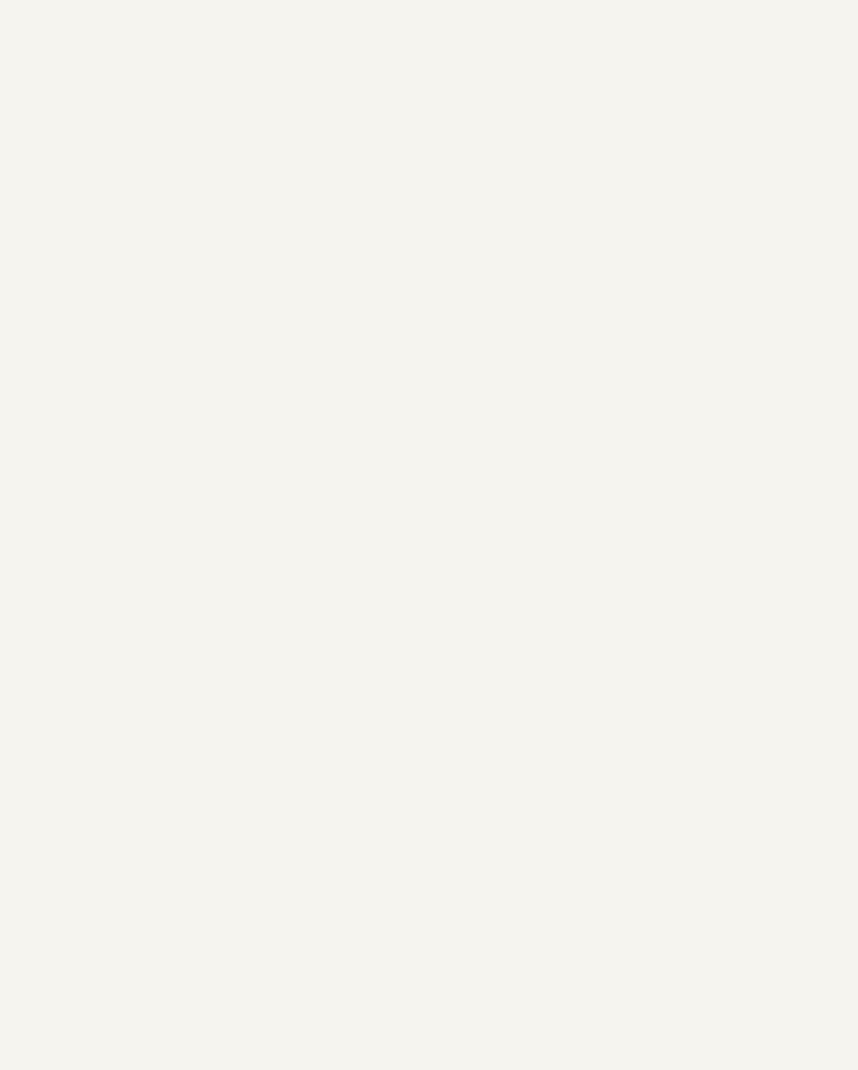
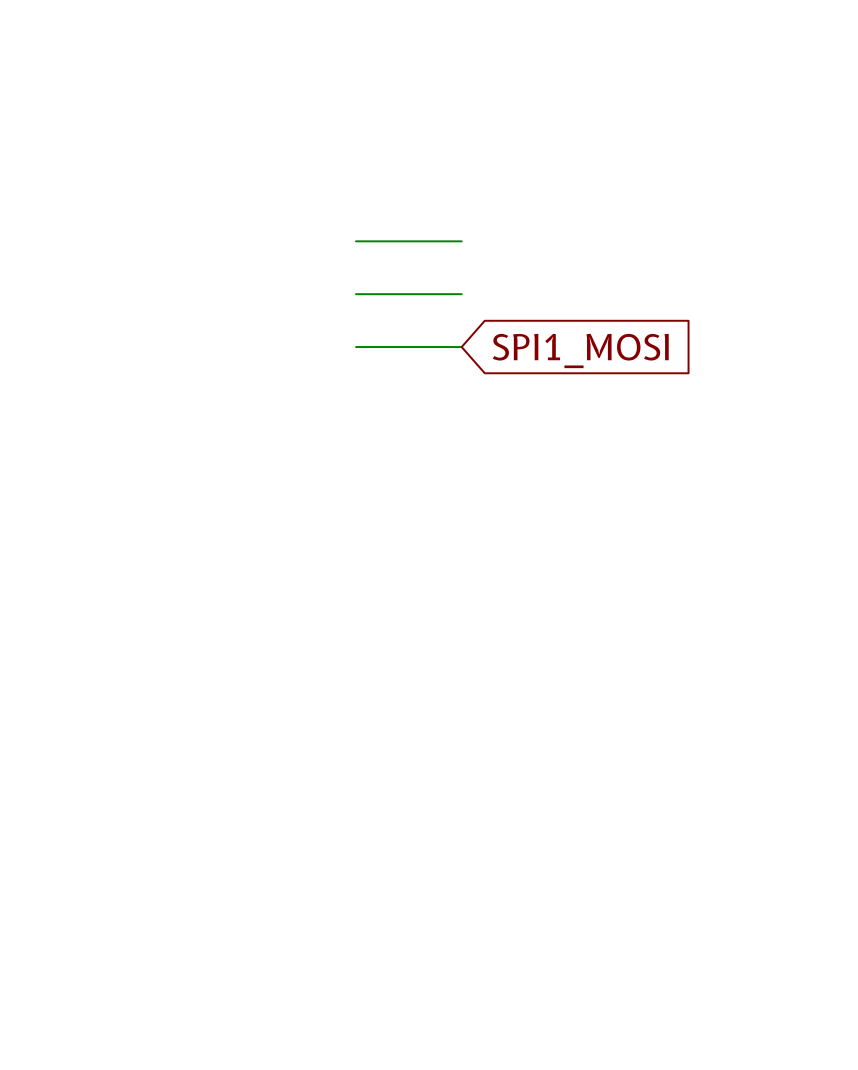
wire: none -> (355, 241) (461, 241)
wire: none -> (355, 294) (461, 294)
wire: none -> (355, 347) (461, 347)
global label: none -> SPI1_MOSI (580, 350)

